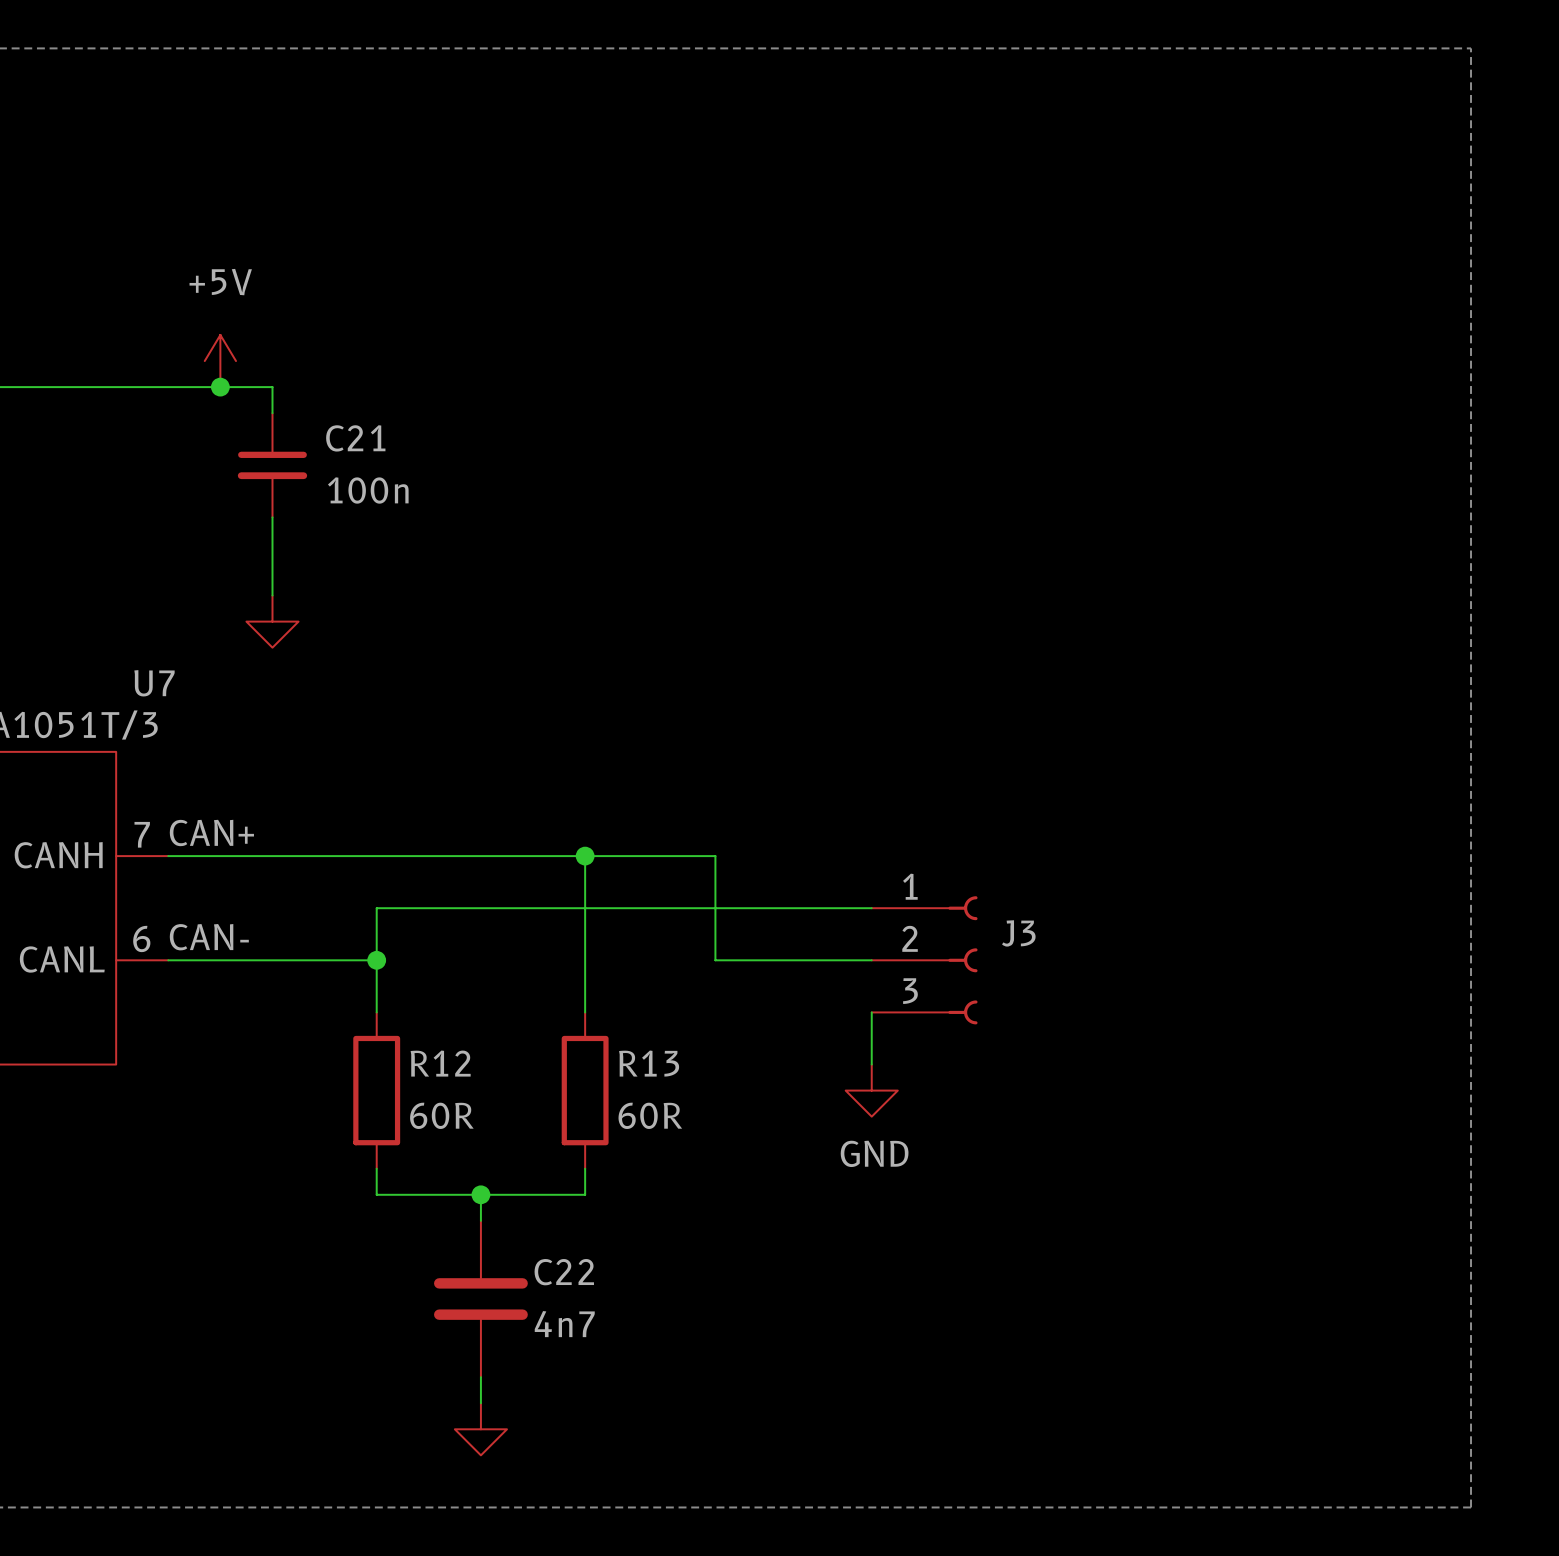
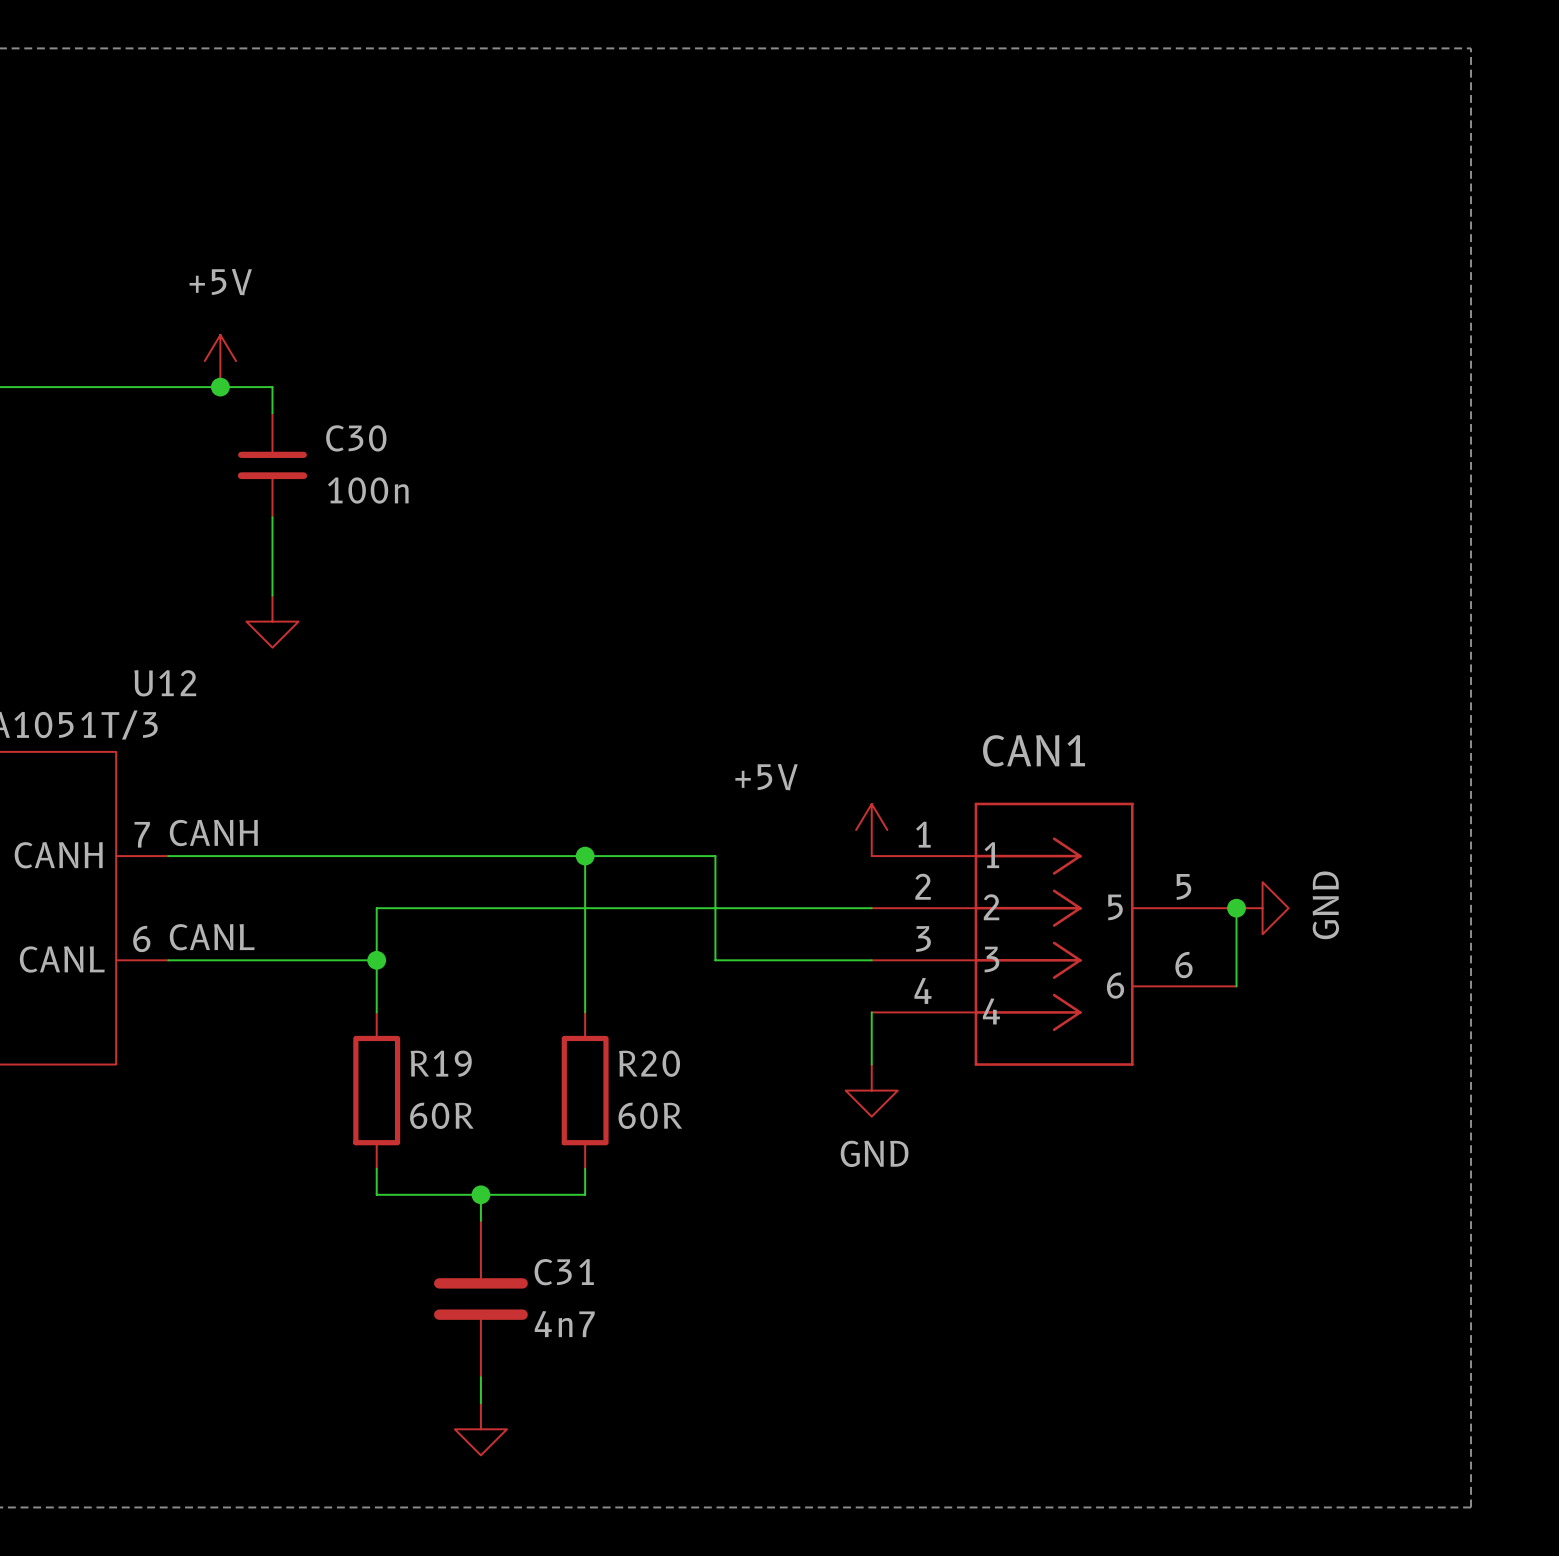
C21 name: C21 (355, 438) -> C30 (356, 438)
U7 name: U7 (154, 683) -> U12 (165, 683)
power symbol: none -> +5V (871, 830)
label: CAN+ (211, 832) -> CANH (213, 832)
wire: none -> (1236, 908) (1236, 986)
junction: none -> (1236, 908)
power symbol: none -> GND (1262, 908)
CAN1: none -> (1054, 934)
label: CAN- (209, 937) -> CANL (212, 937)
J3: (924, 960) -> none
R12 name: R12 (440, 1063) -> R19 (441, 1063)
R13 name: R13 (649, 1063) -> R20 (649, 1063)
C22 name: C22 (564, 1272) -> C31 (564, 1272)

